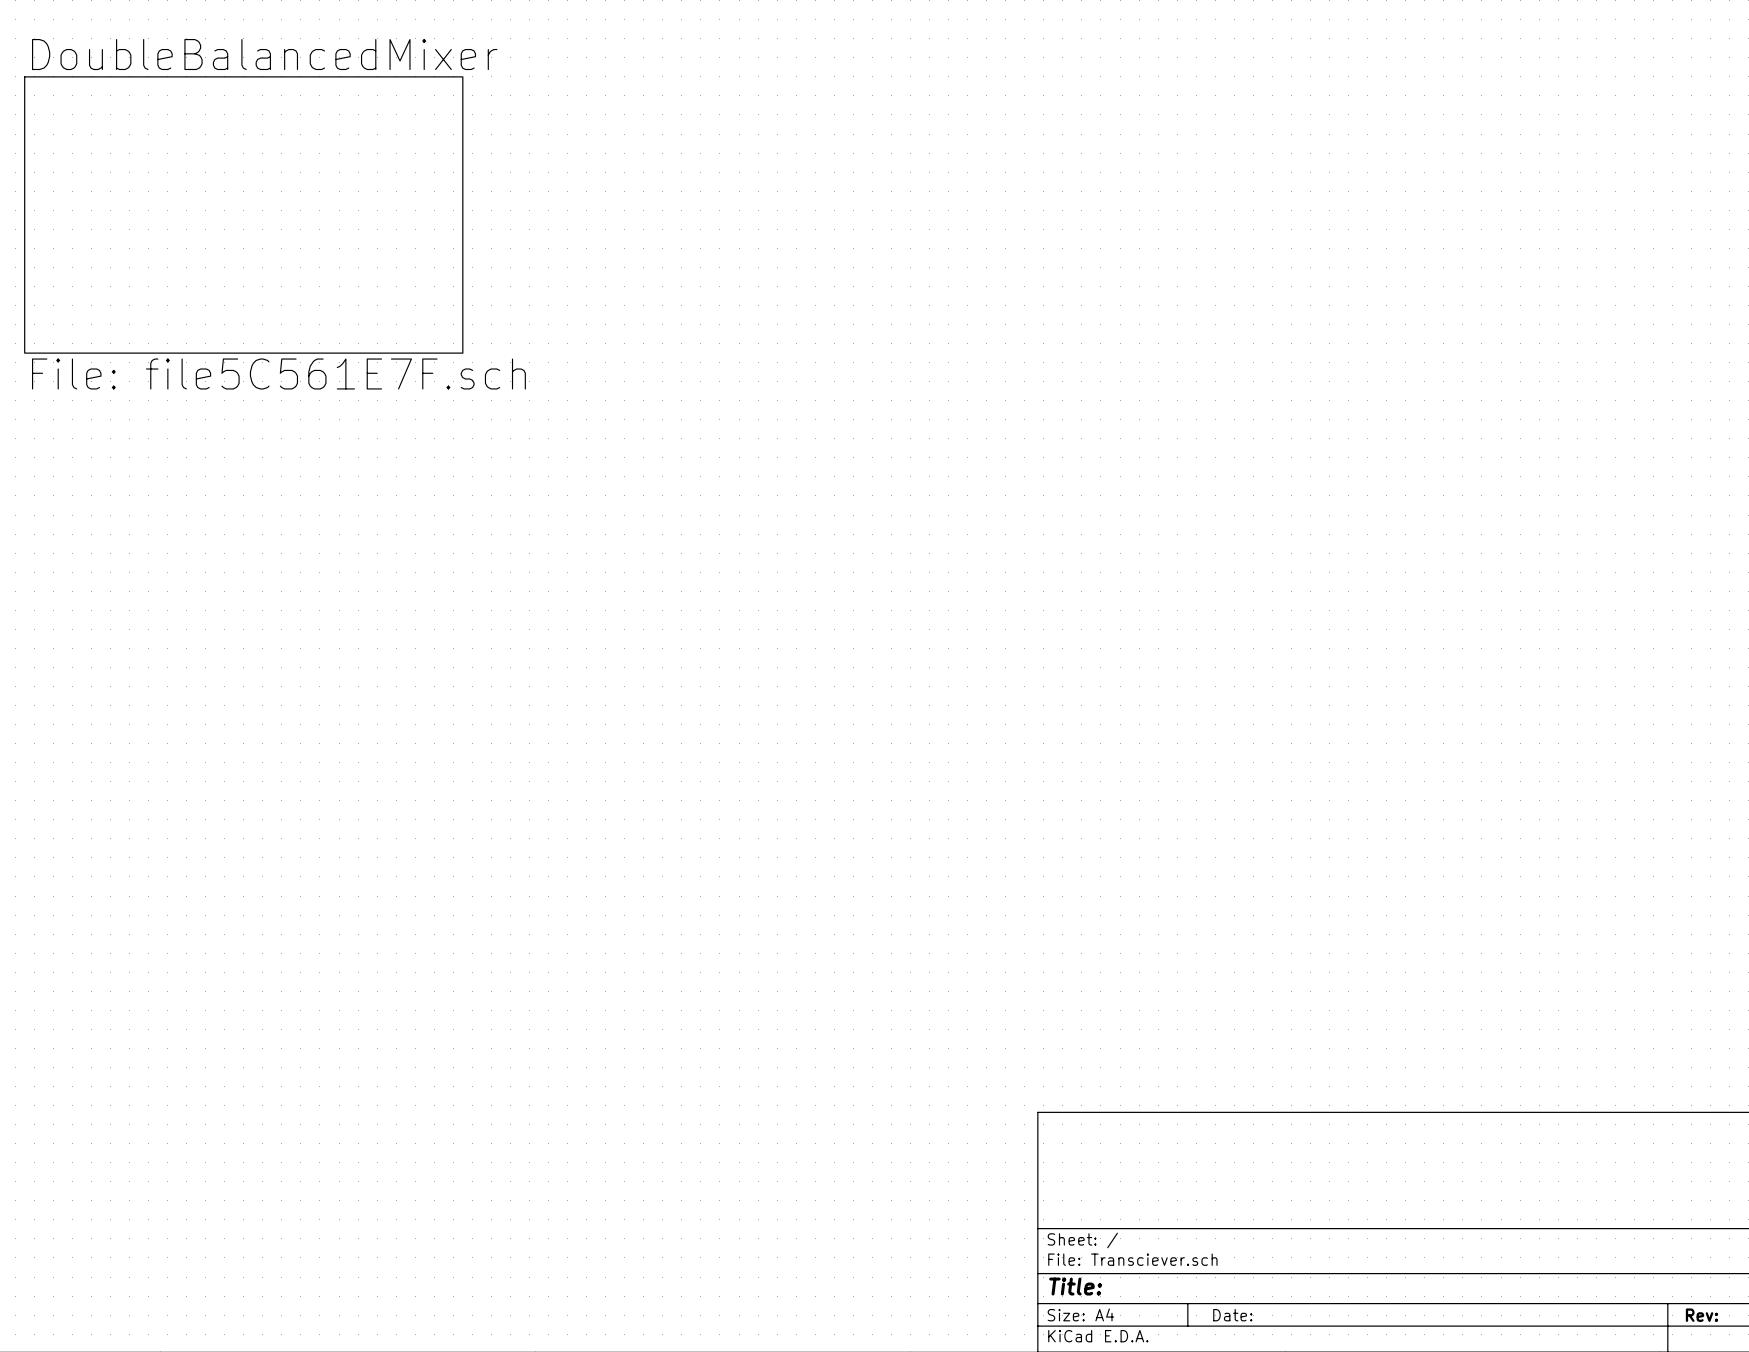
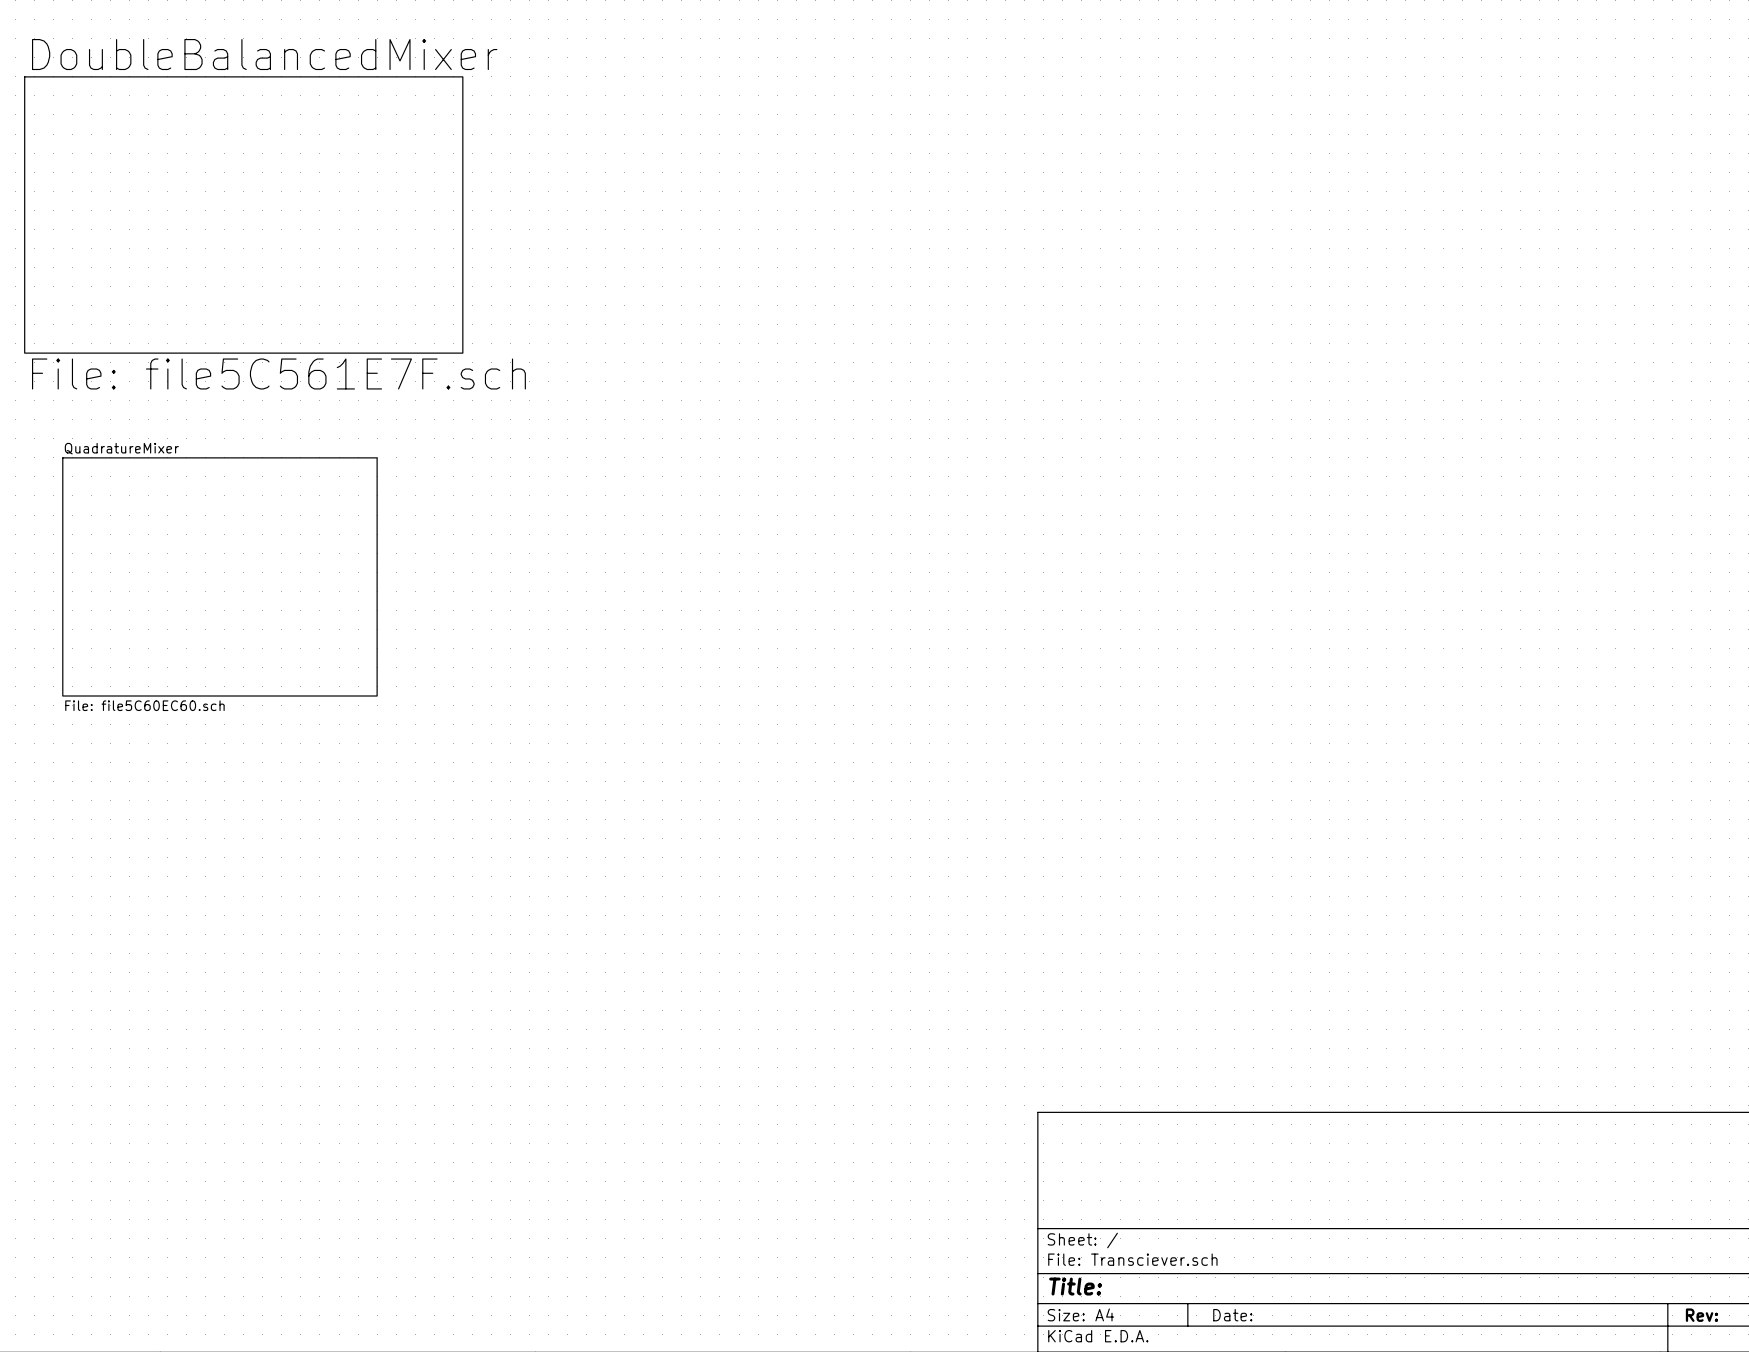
sheet QuadratureMixer: none -> File: file5C60EC60.sch (219, 576)

